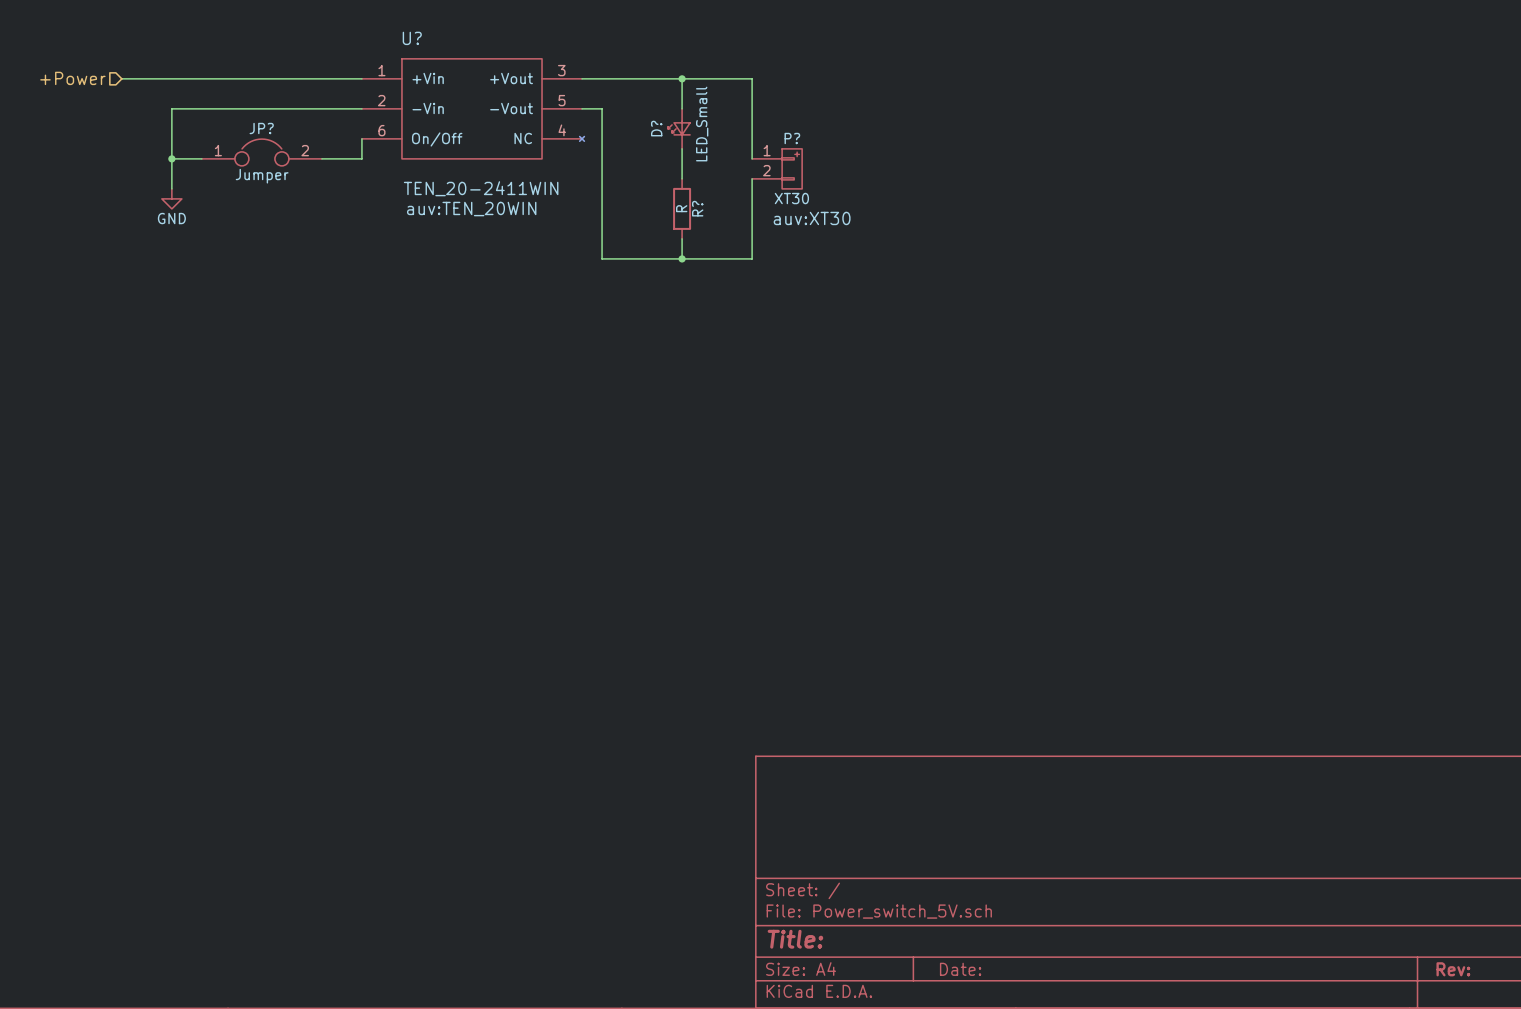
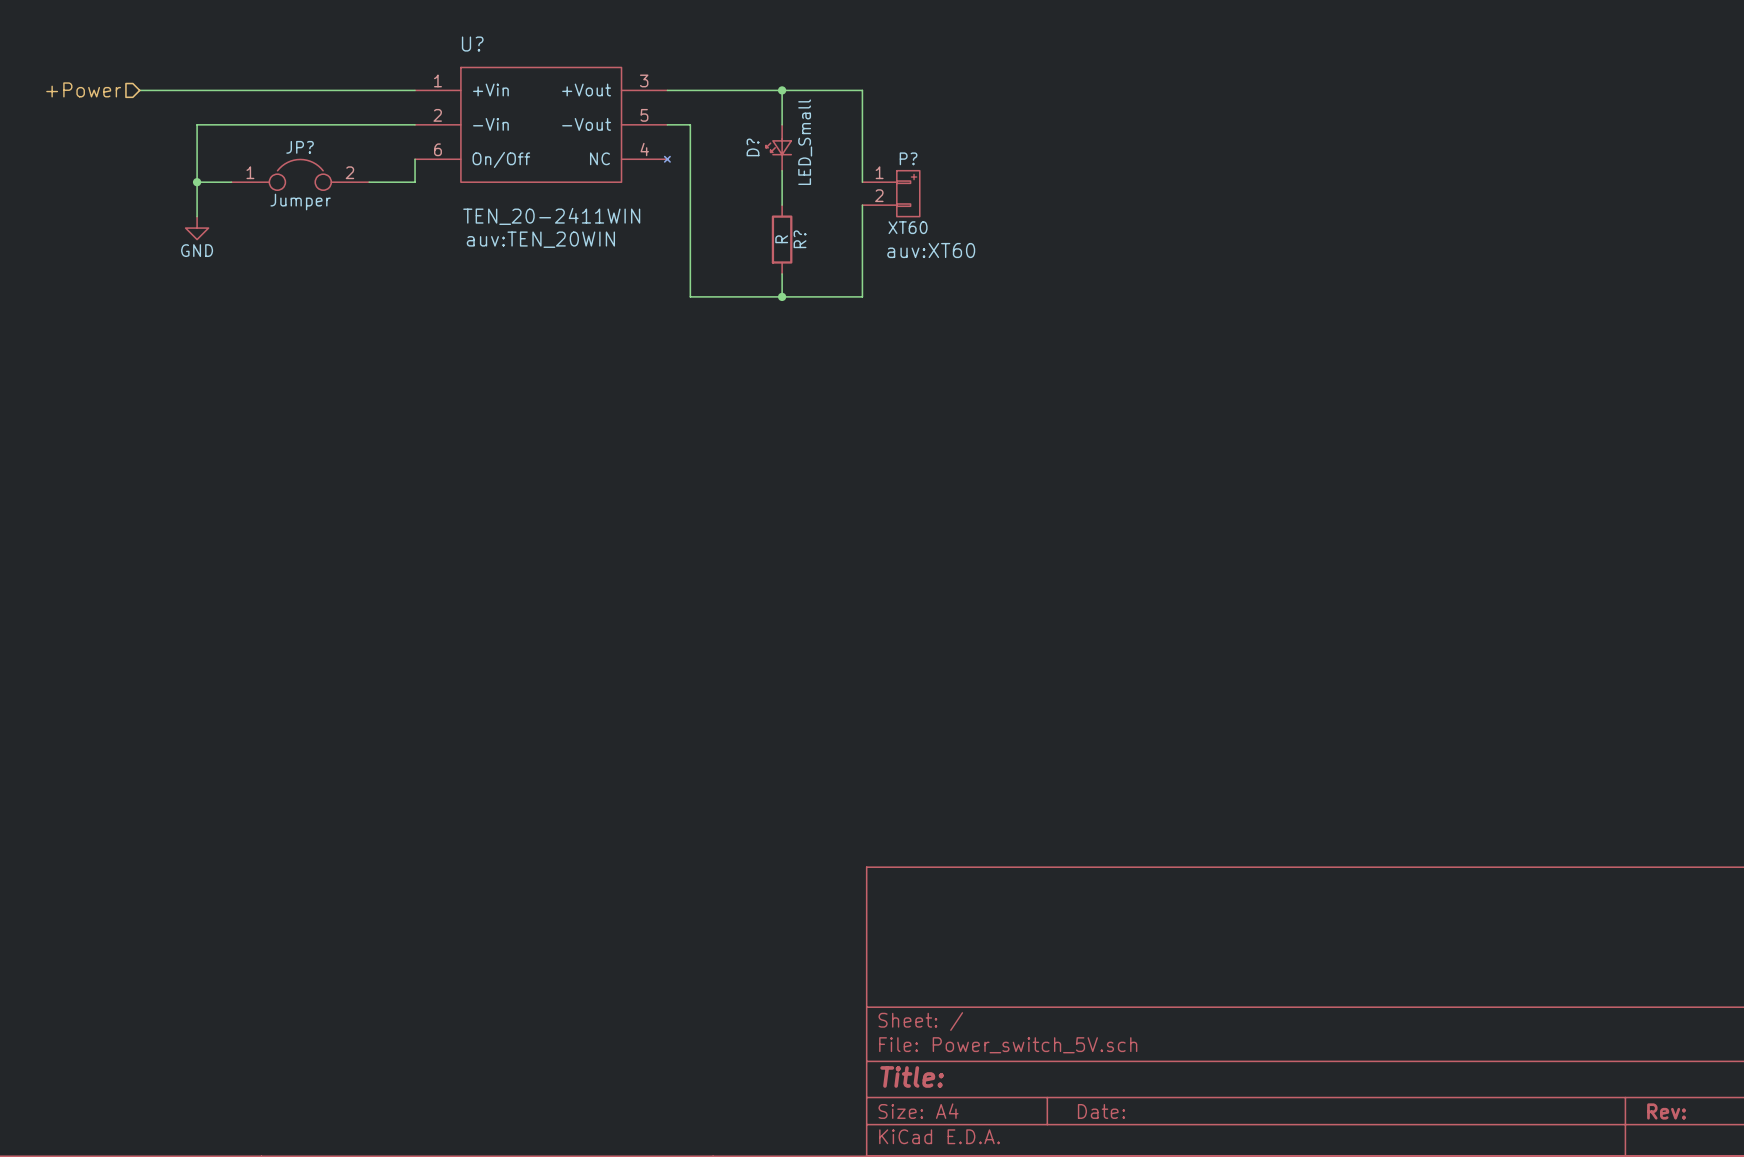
P? value: XT30 (791, 198) -> XT60 (908, 227)
P? text: auv:XT30 (812, 218) -> auv:XT60 (931, 250)

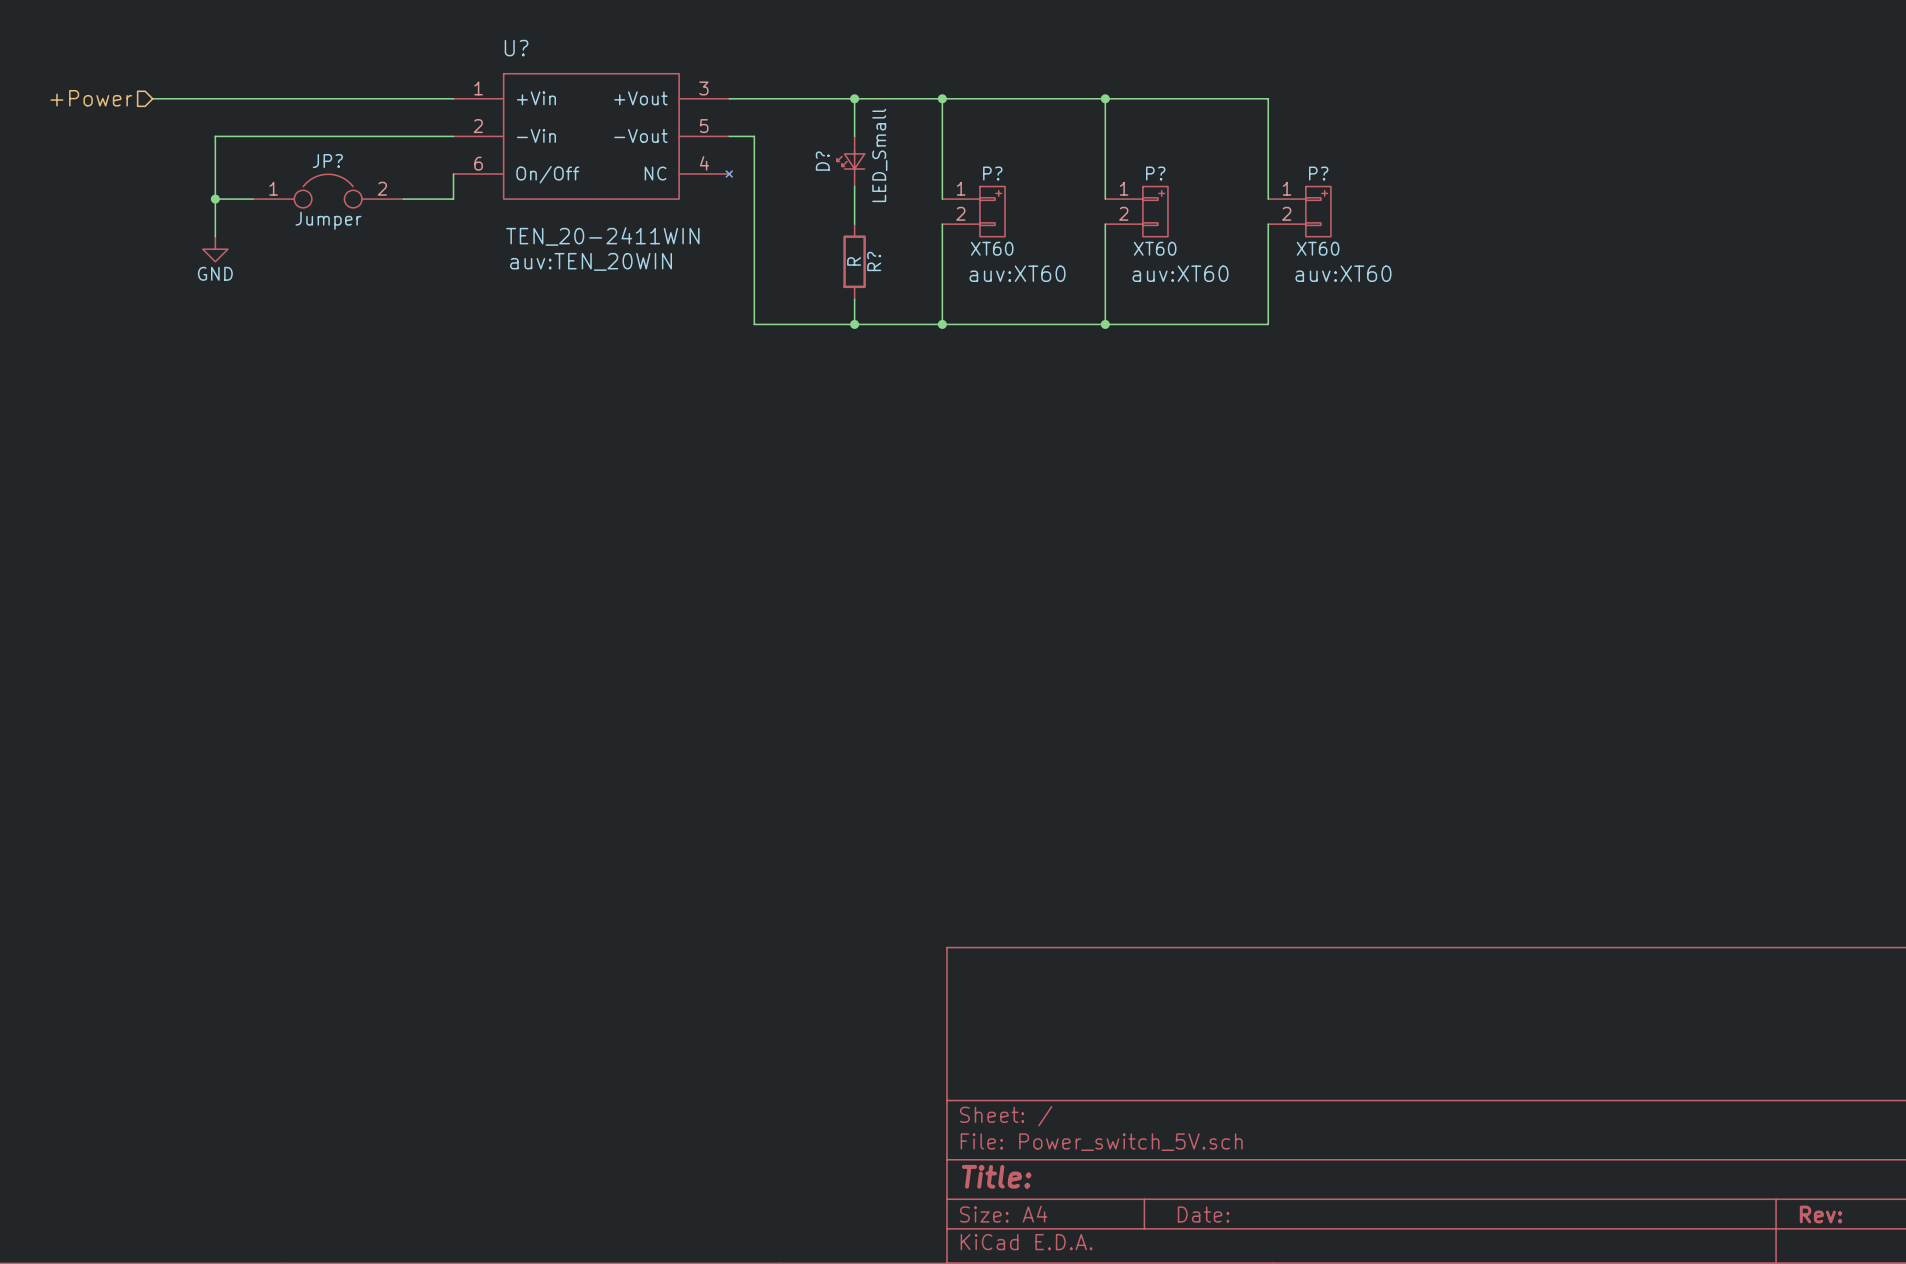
wire: none -> (942, 98) (1268, 98) (1268, 199)
junction: none -> (942, 98)
wire: none -> (1105, 98) (1105, 199)
junction: none -> (1105, 98)
P?: none -> XT60 (1136, 211)
P?: none -> XT60 (1299, 211)
wire: none -> (1105, 224) (1105, 324)
wire: none -> (1268, 224) (1268, 324) (942, 324)
junction: none -> (942, 324)
junction: none -> (1105, 324)

